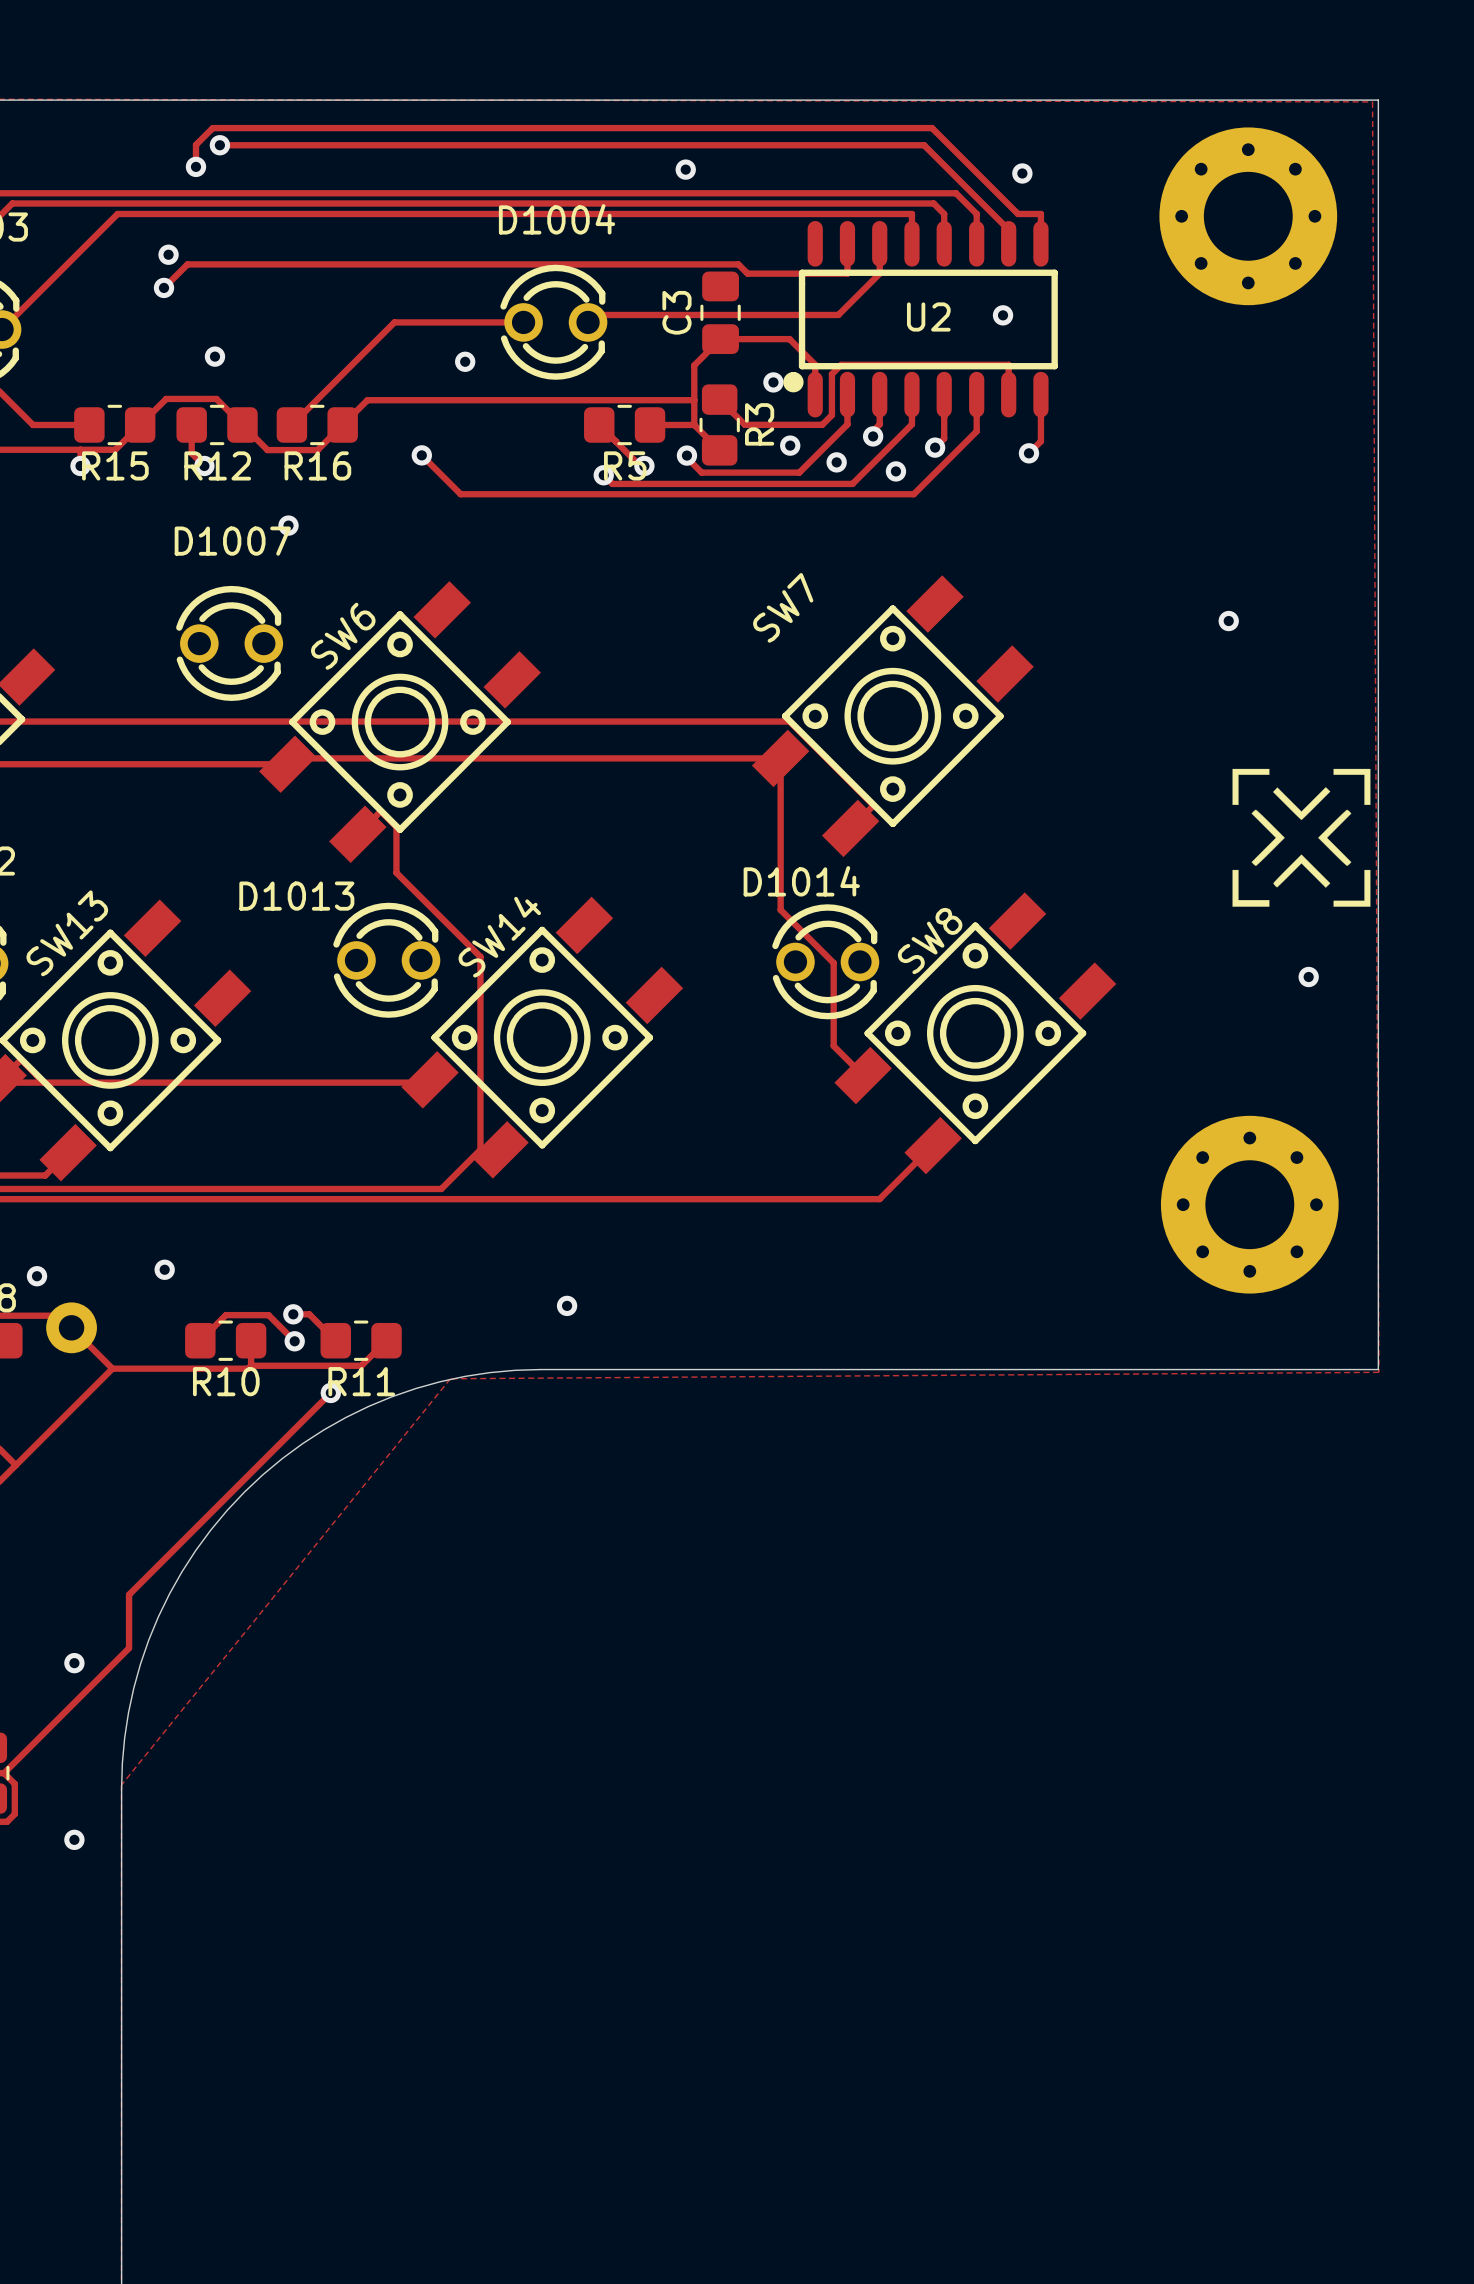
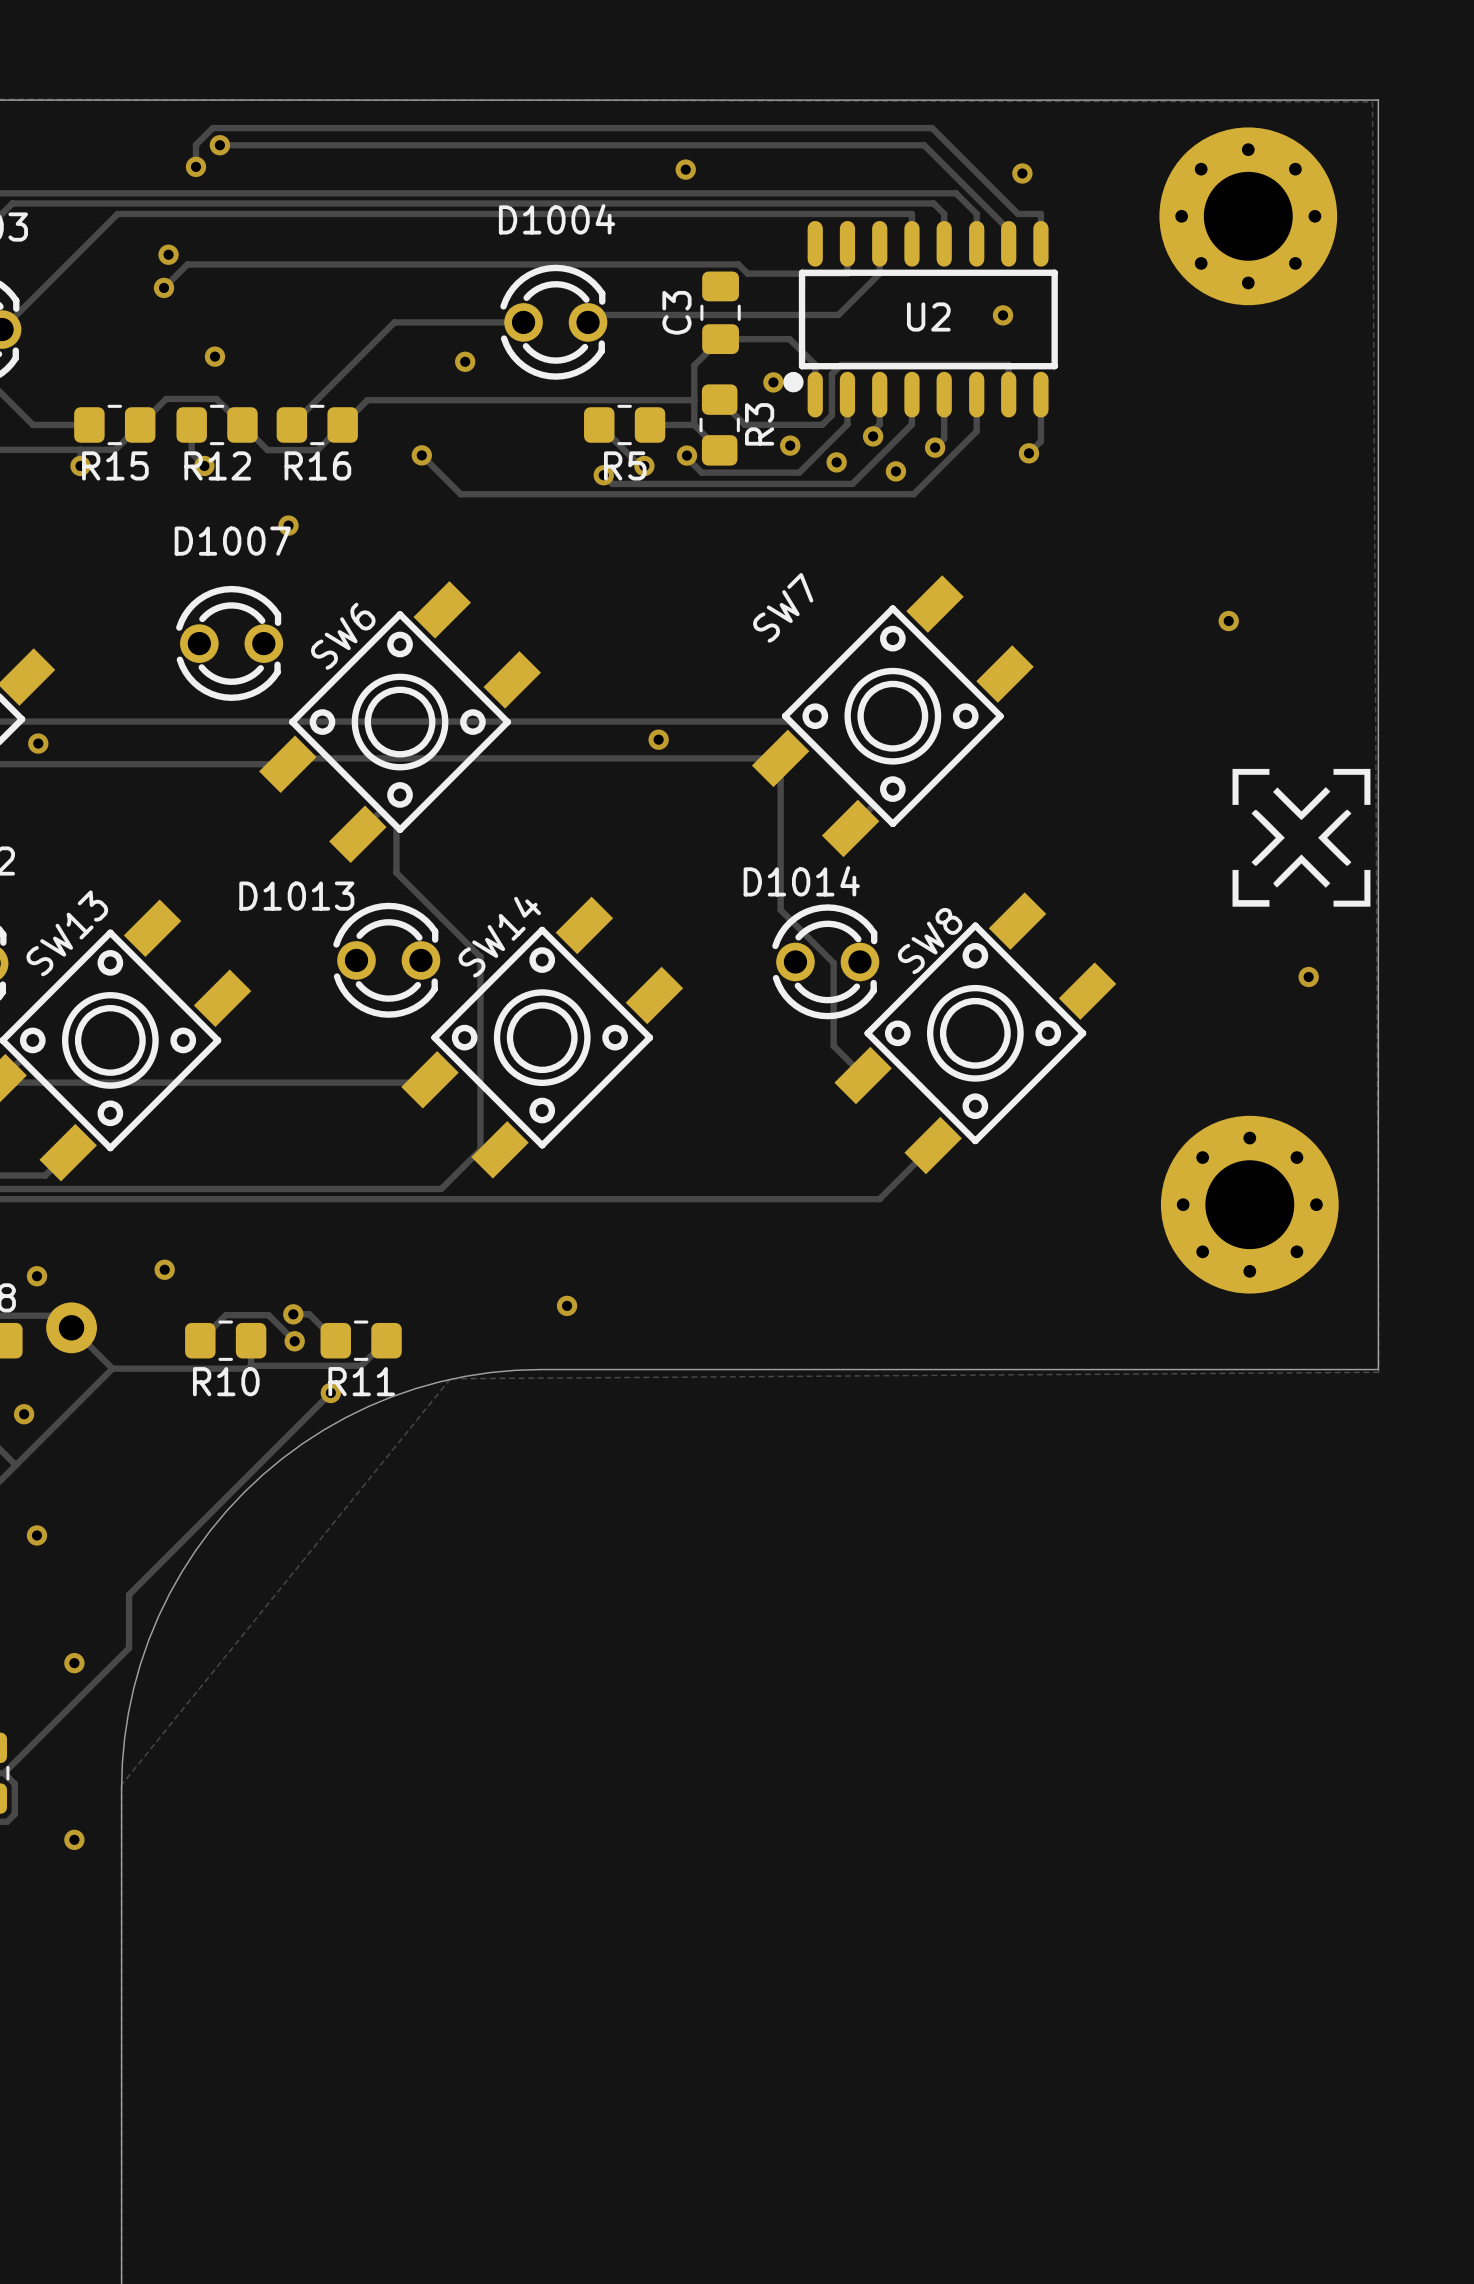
via: none -> (658, 739)
via: none -> (38, 743)
via: none -> (24, 1414)
via: none -> (36, 1535)

